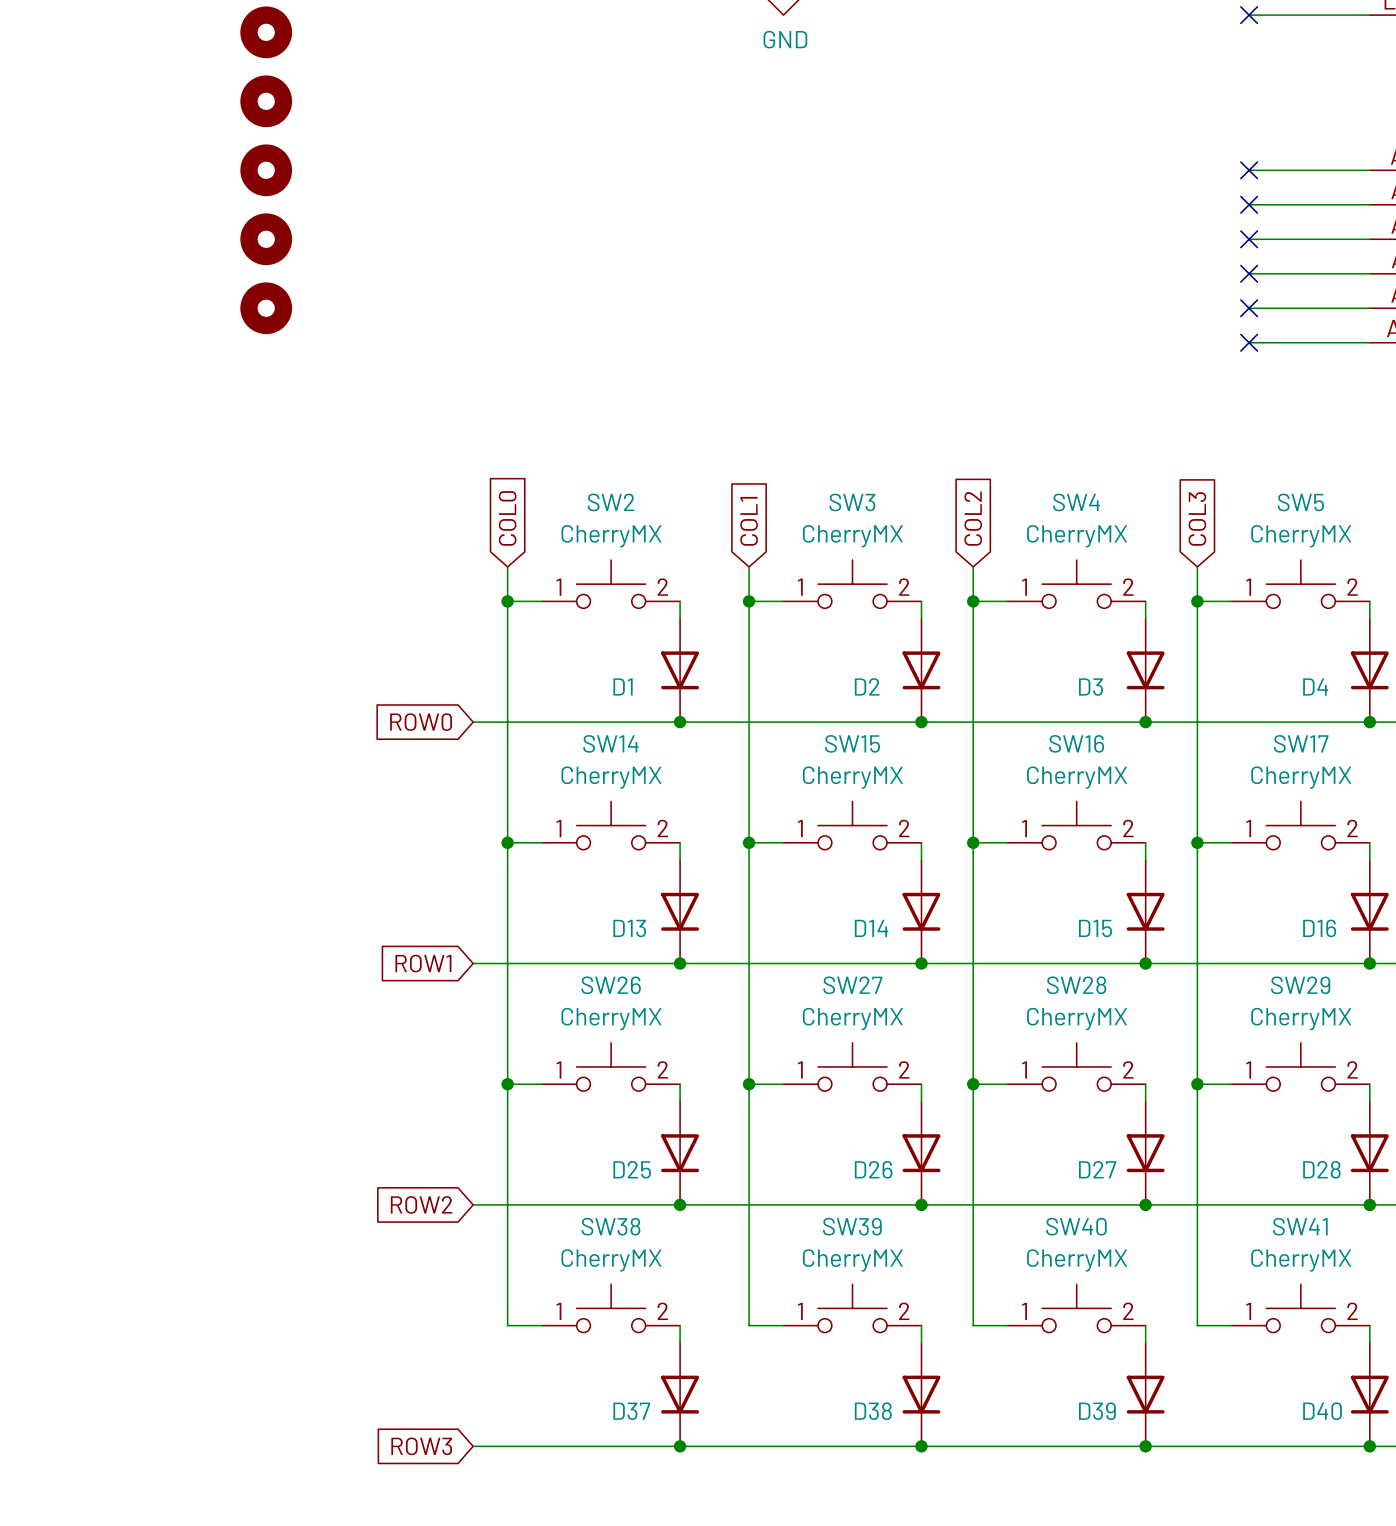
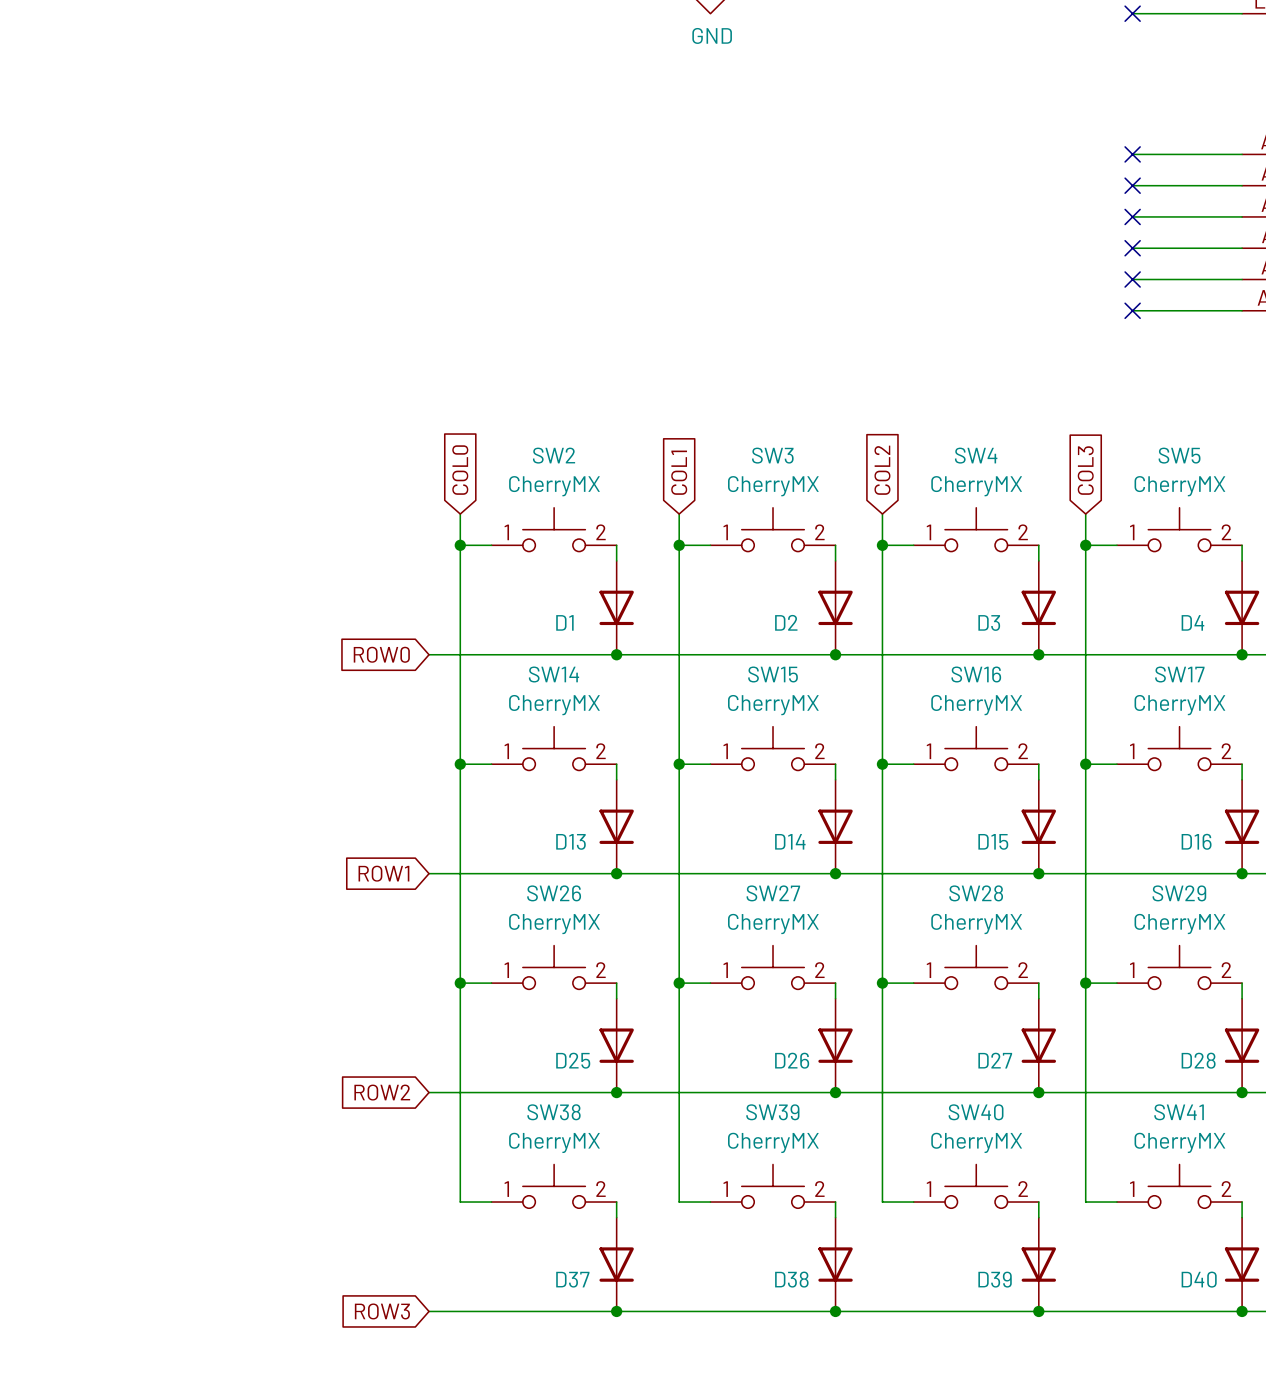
part: (266, 32) -> none
part: (266, 101) -> none
part: (266, 170) -> none
part: (266, 239) -> none
part: (266, 308) -> none

